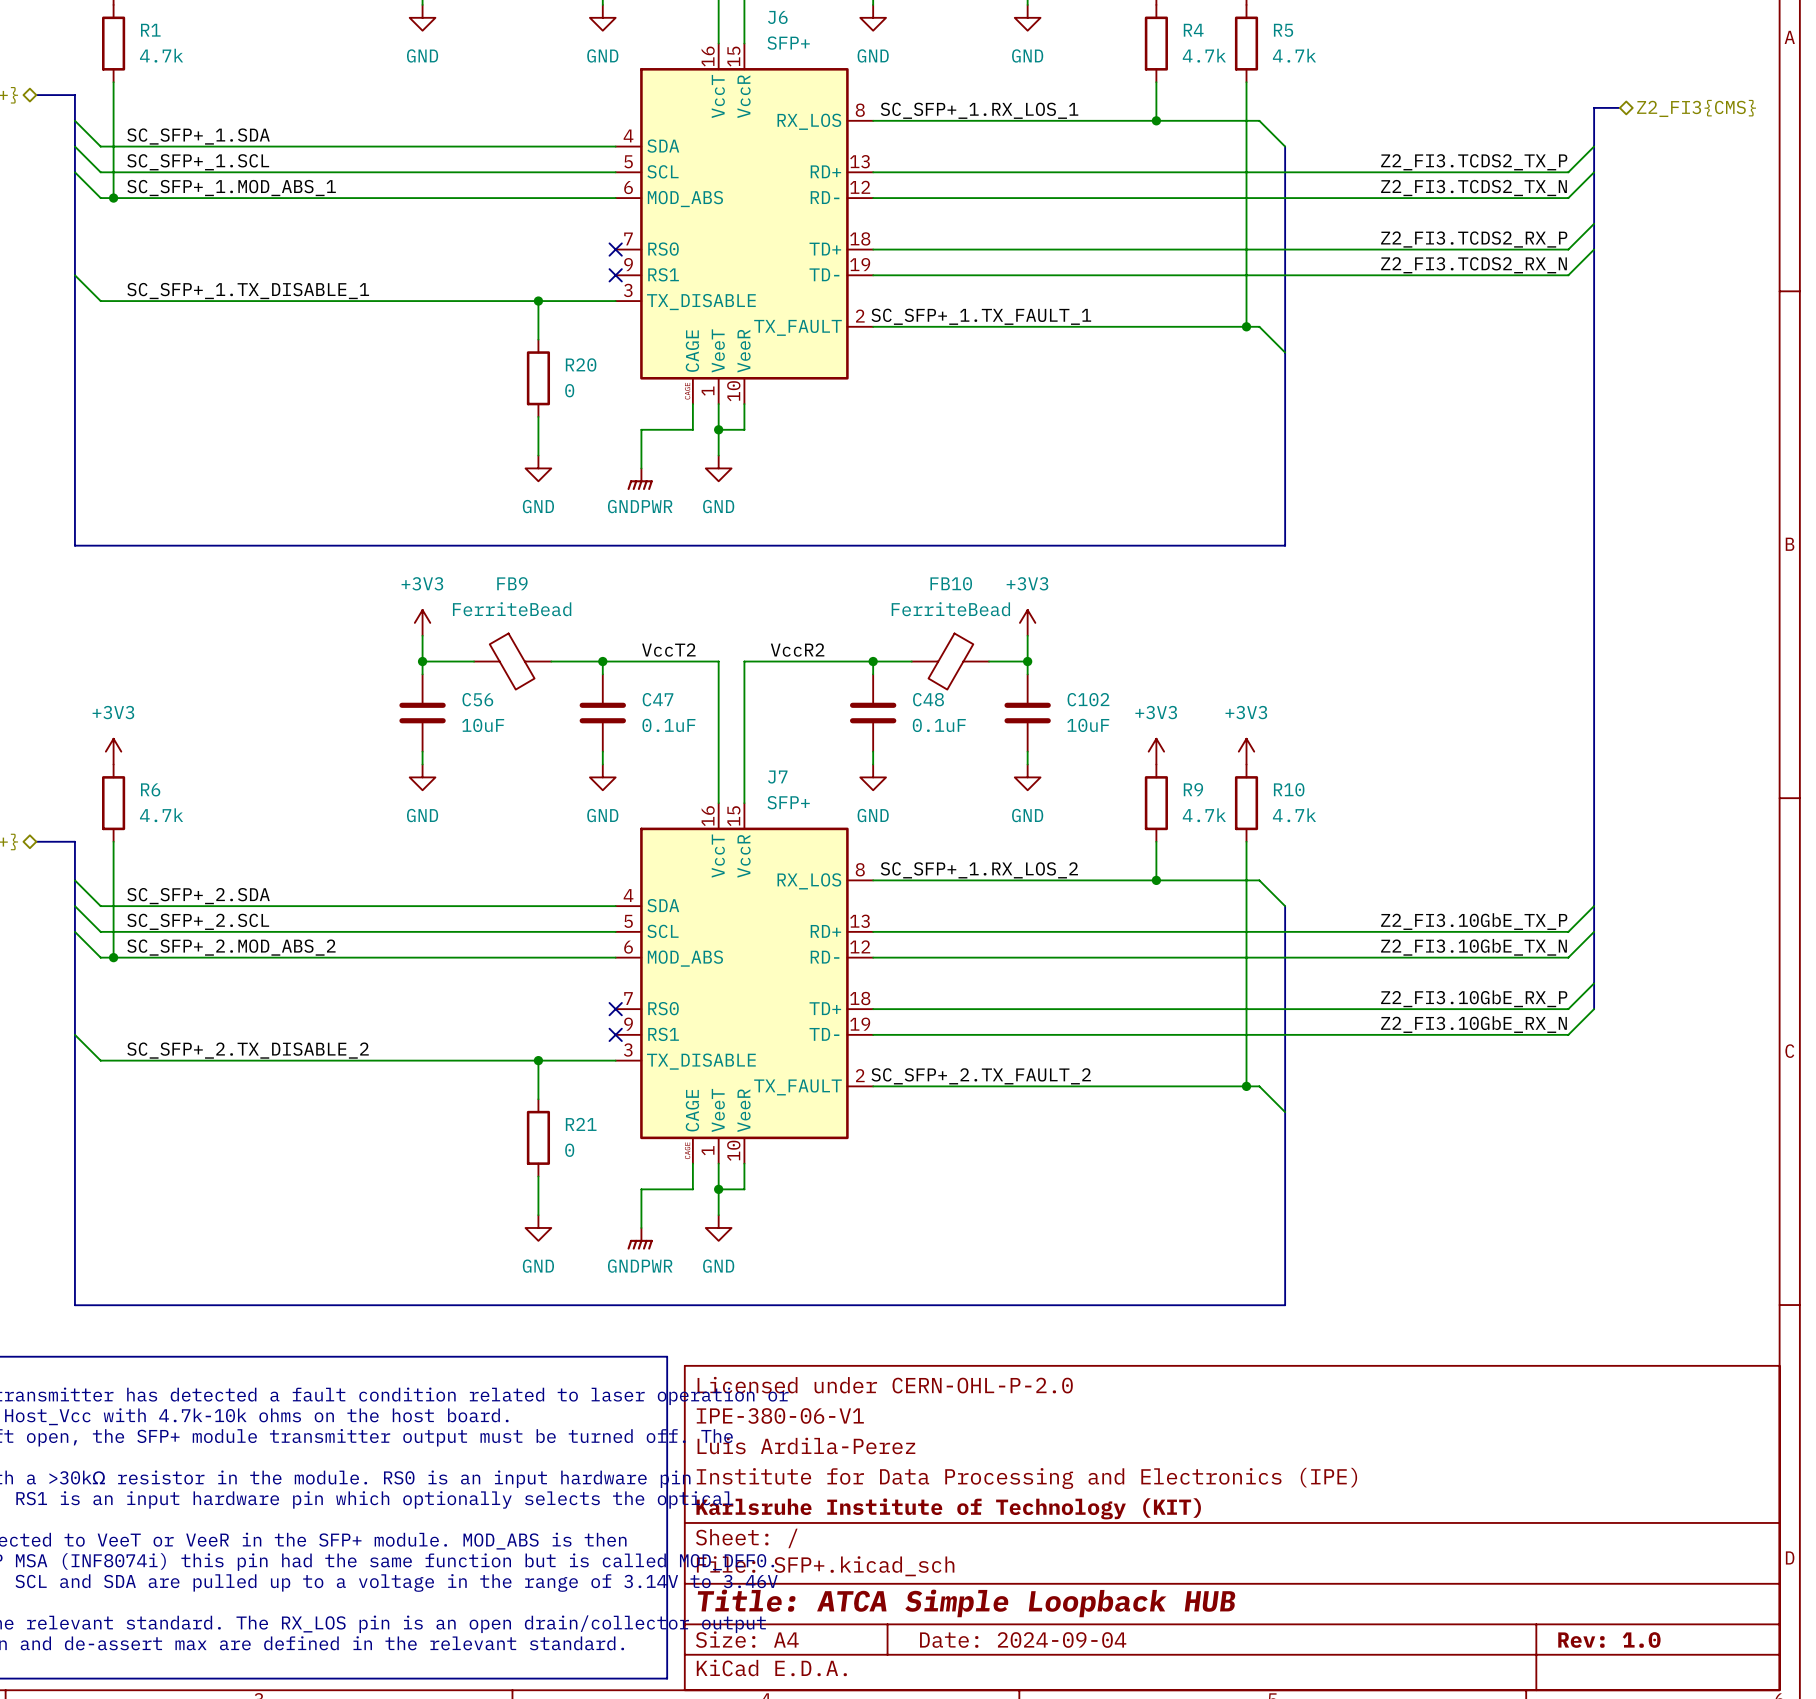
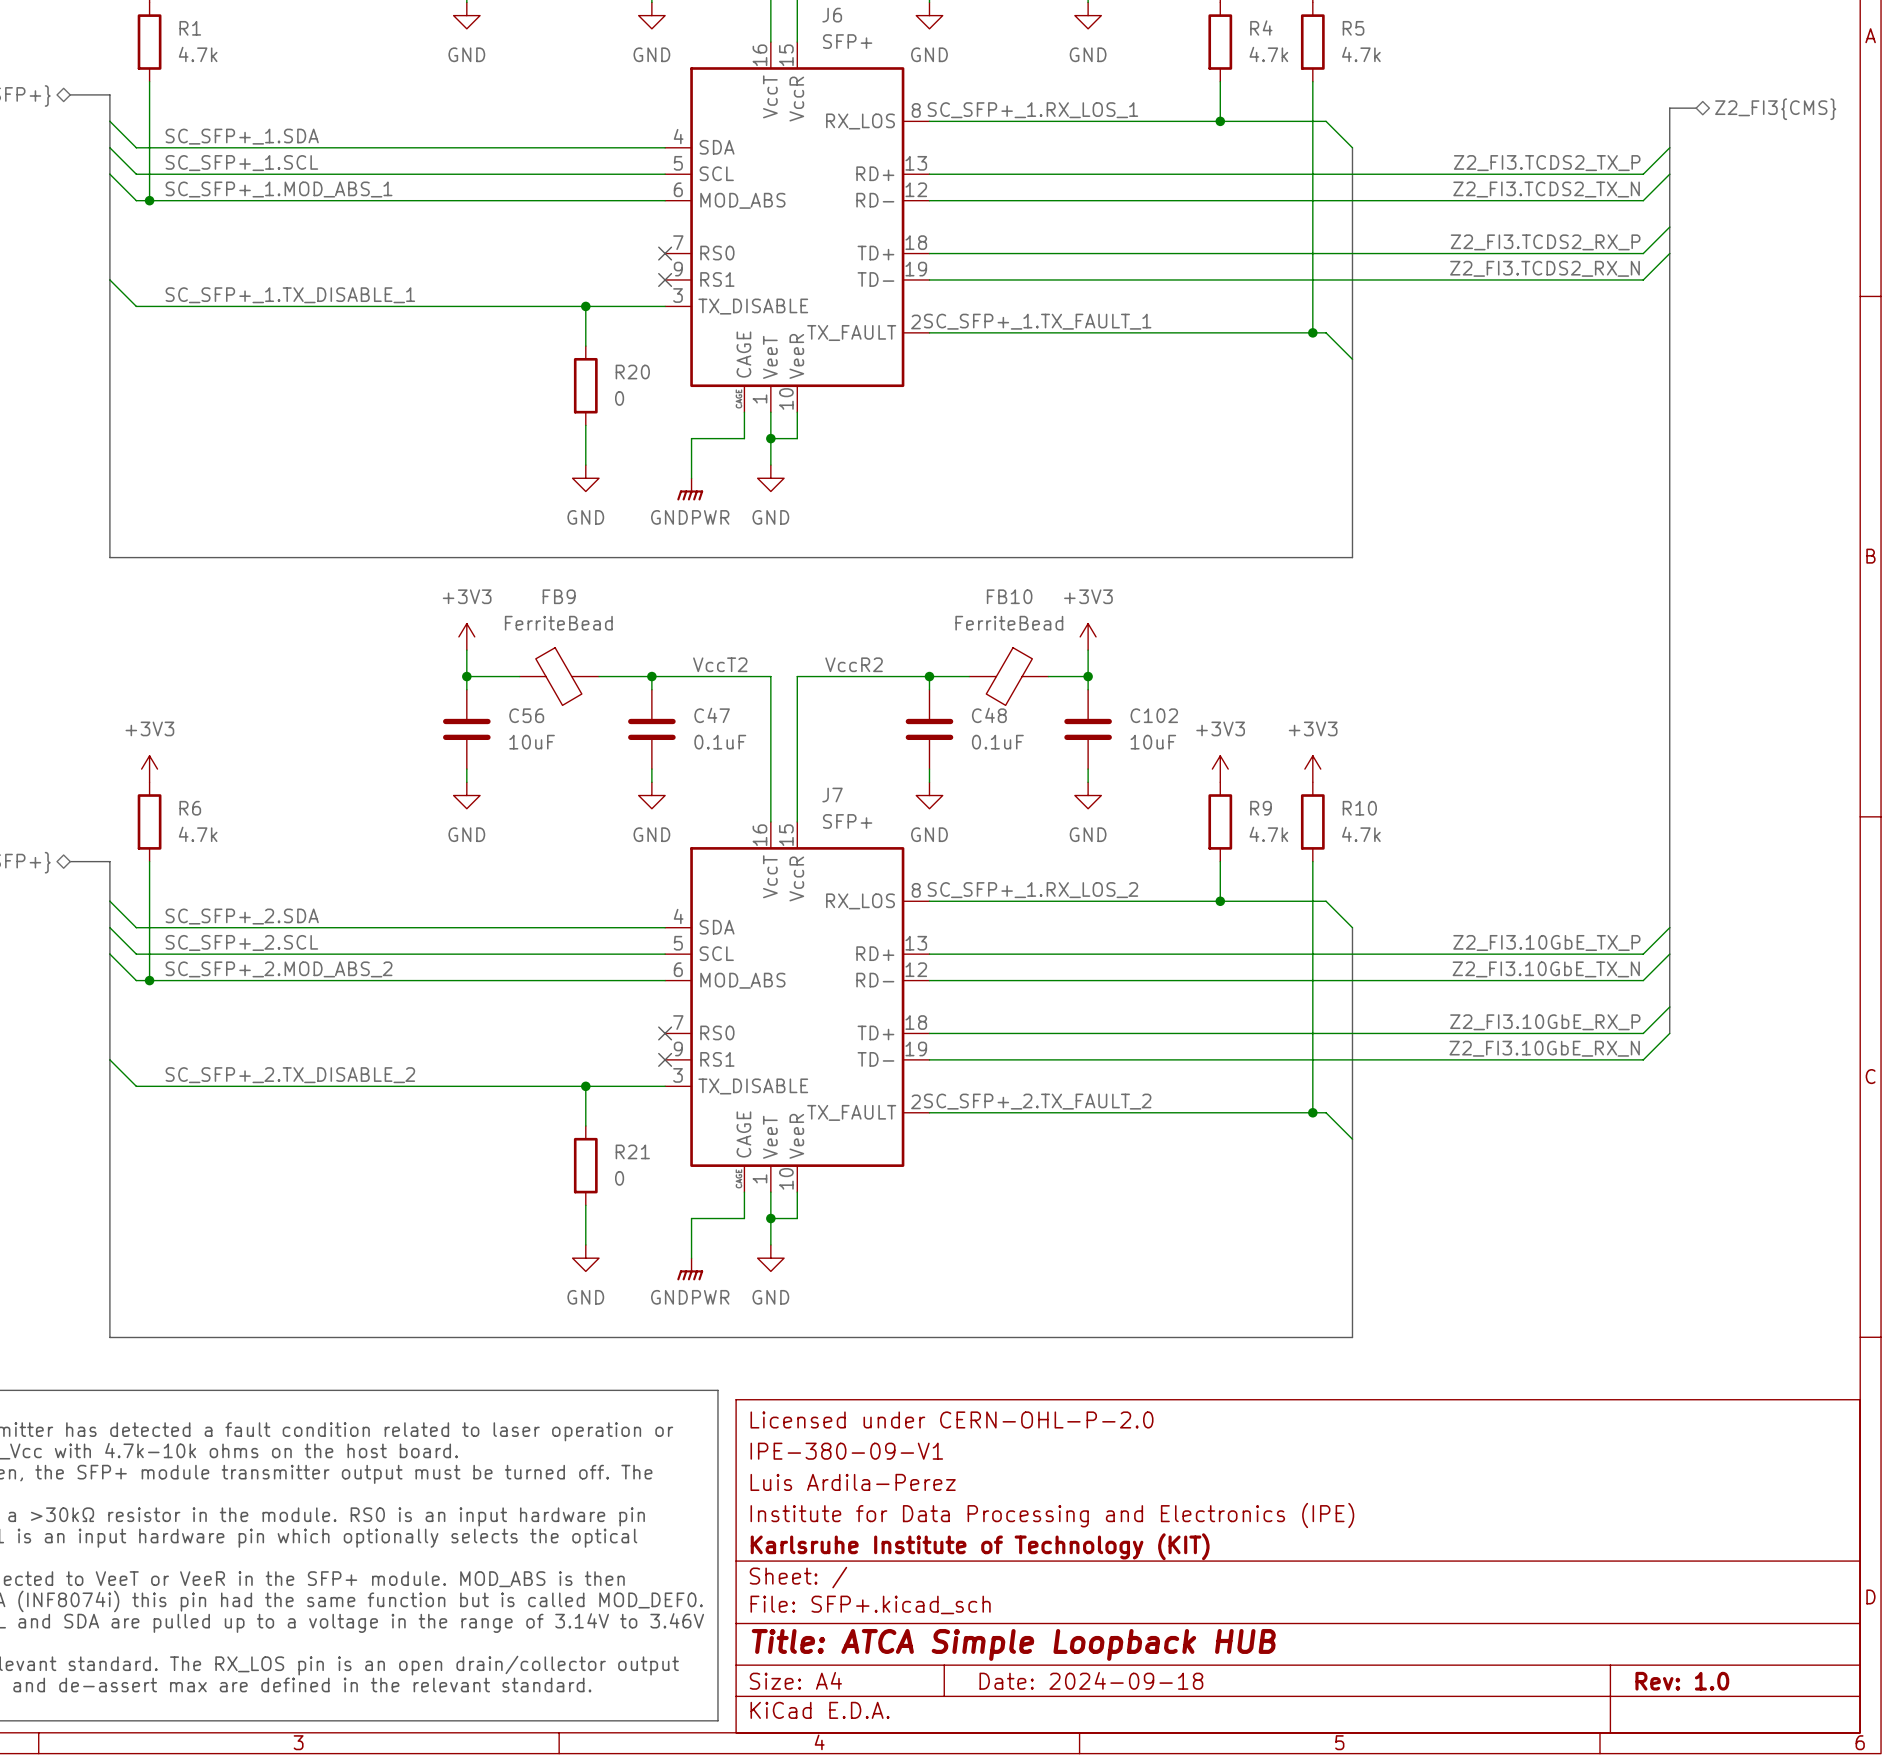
title block: IPE-380-06-V1 (780, 1415) -> IPE-380-09-V1 (846, 1451)
title block: Date: 2024-09-04 (1023, 1640) -> Date: 2024-09-18 (1091, 1680)

